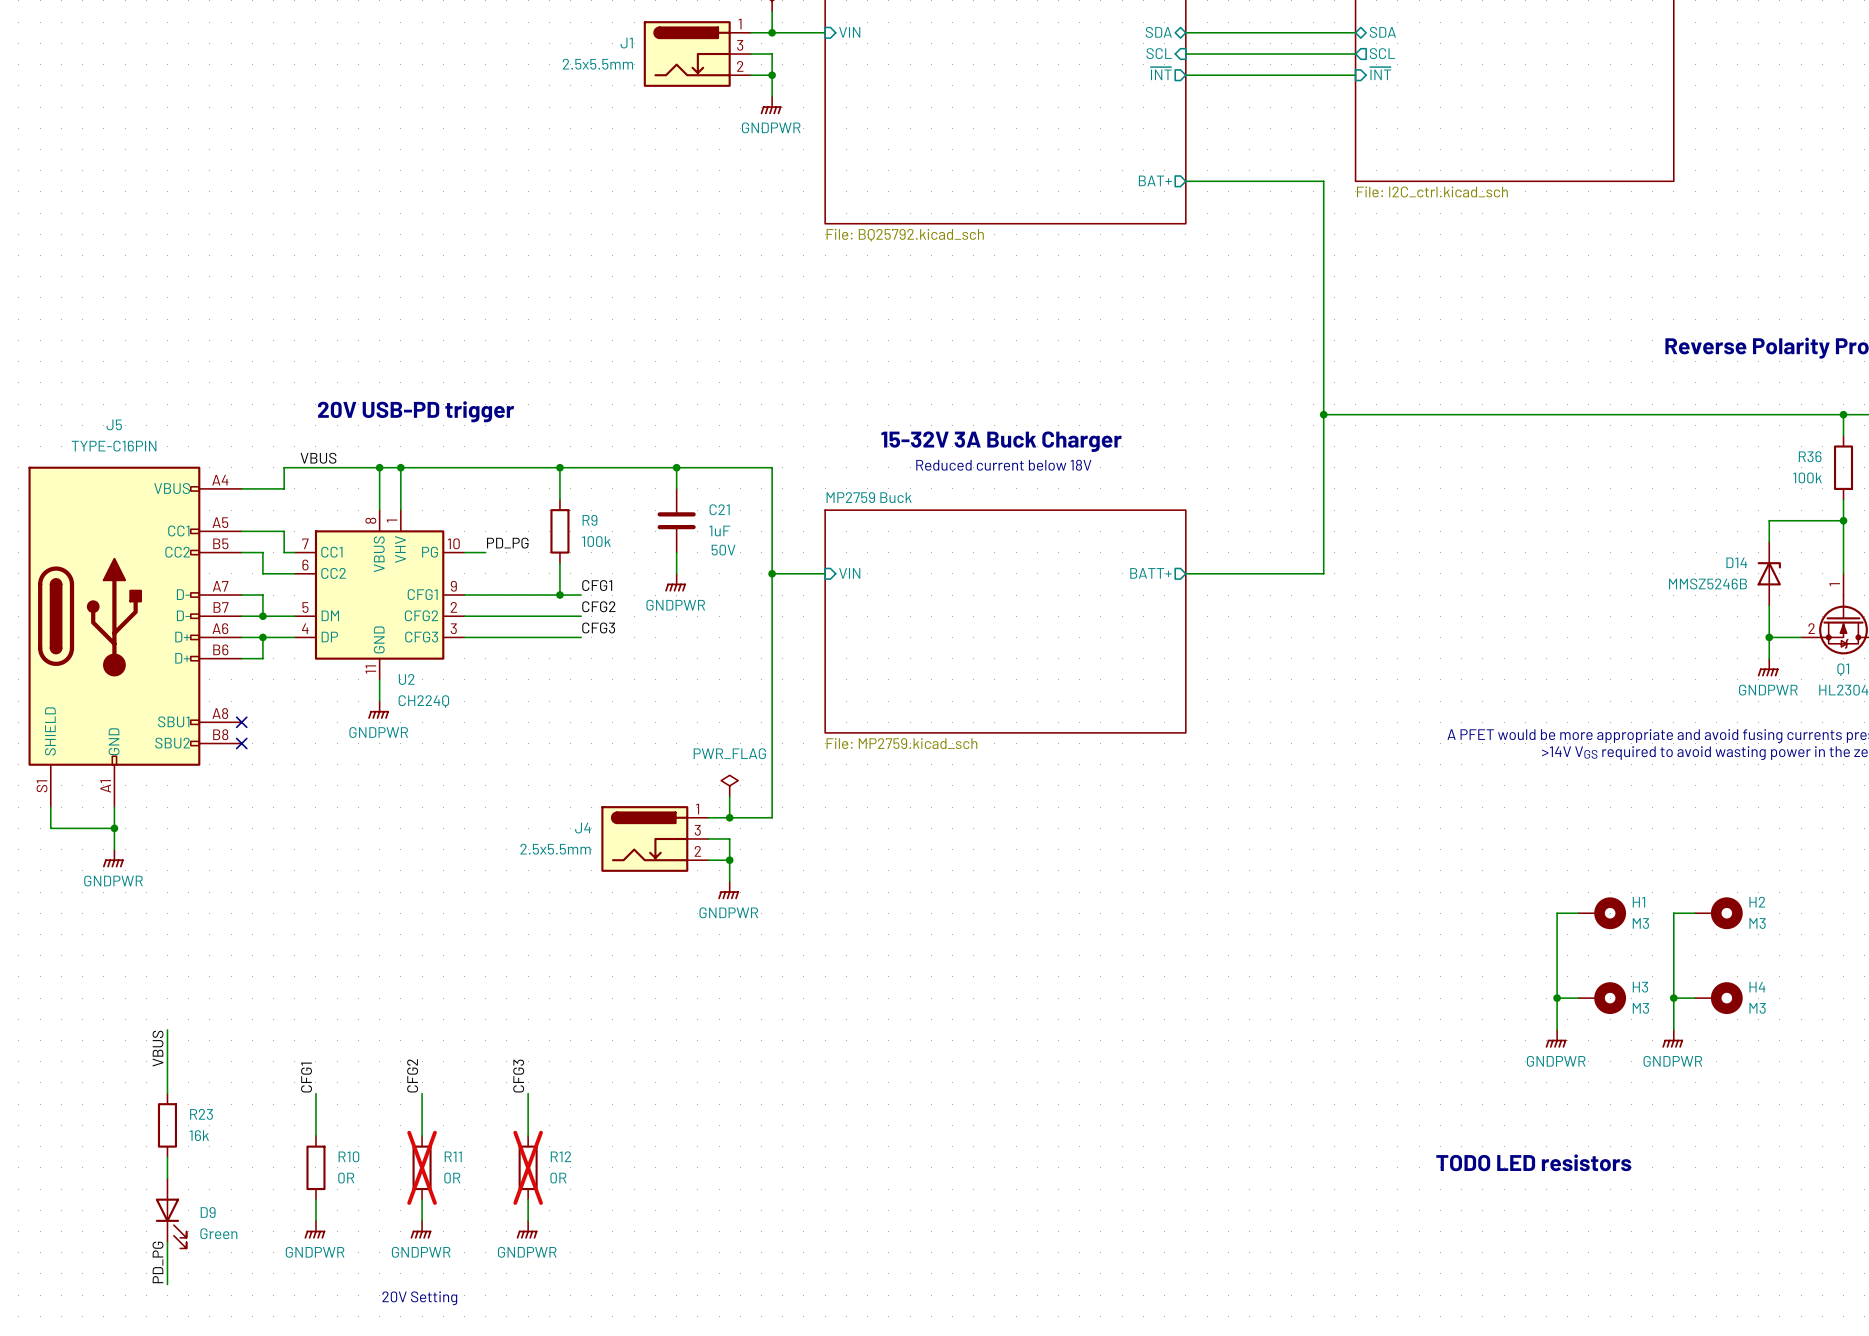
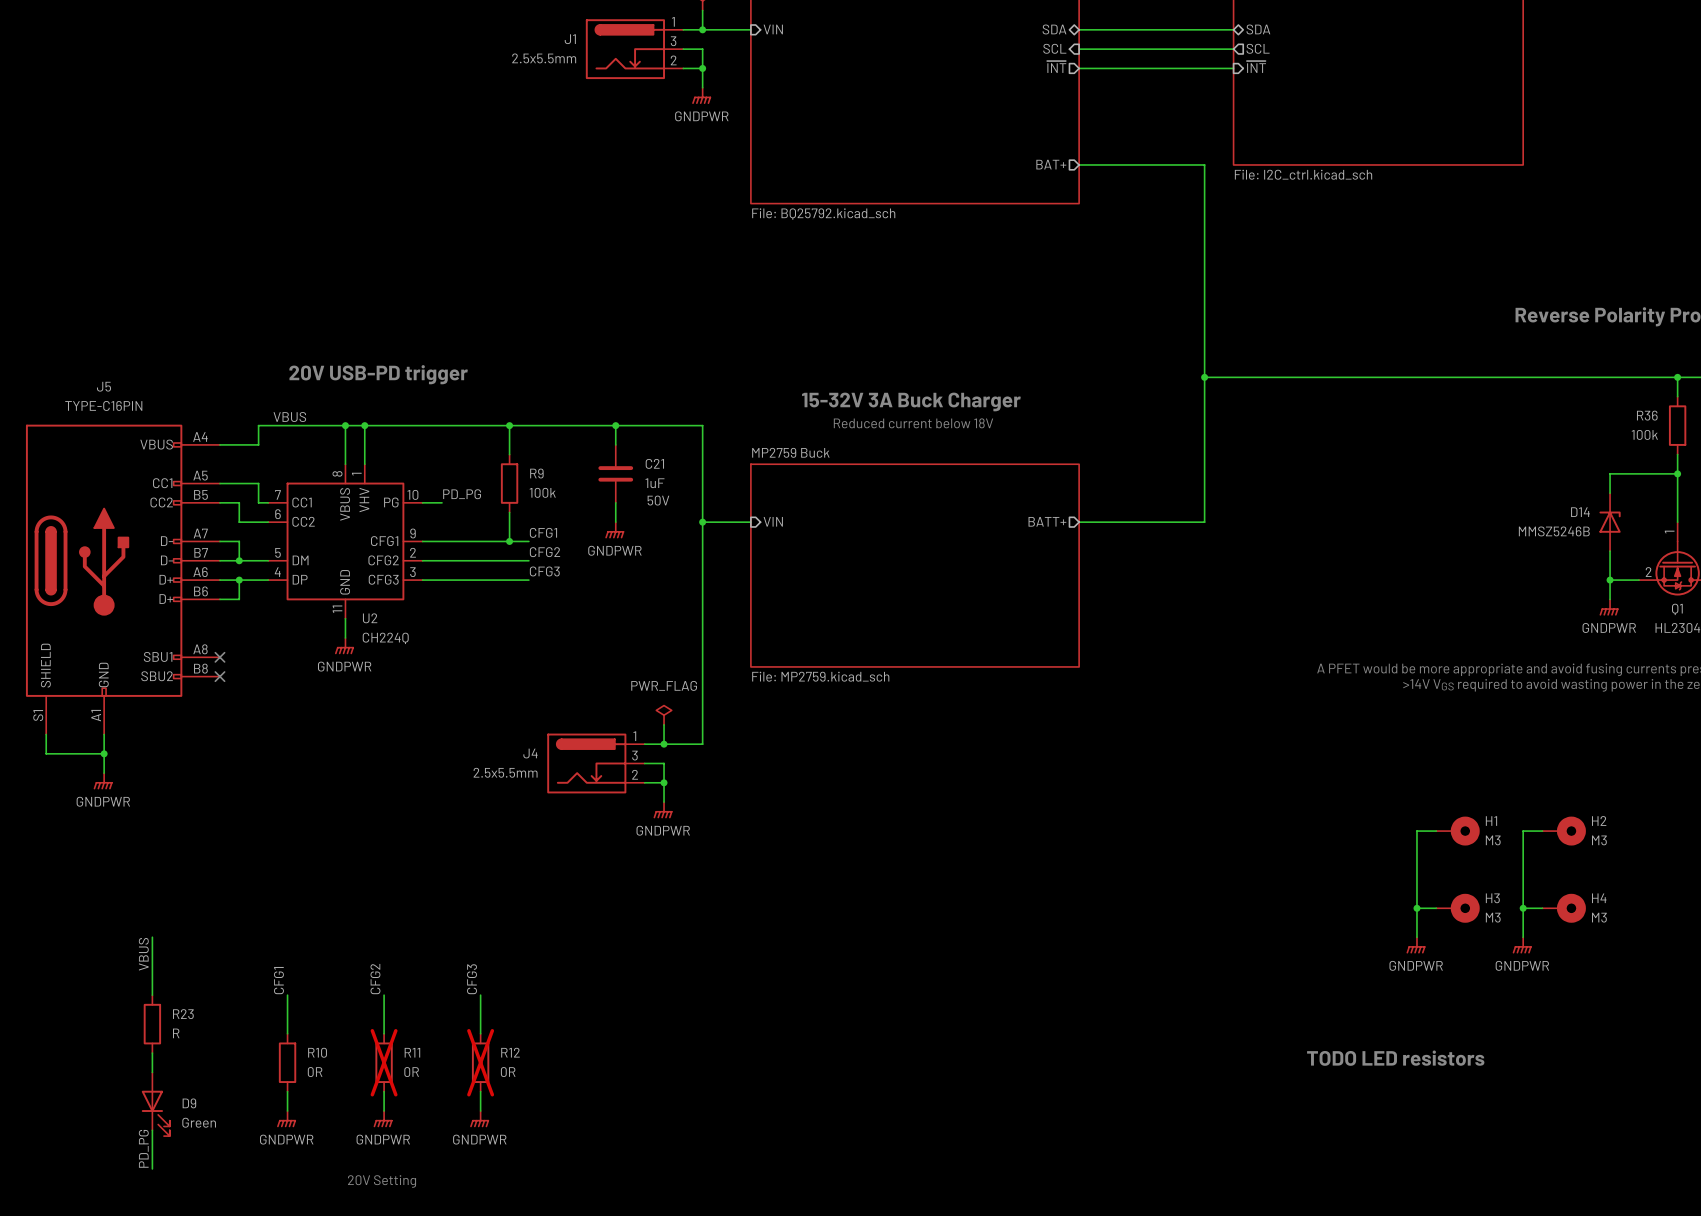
R23 value: 16k (199, 1135) -> R (176, 1033)

